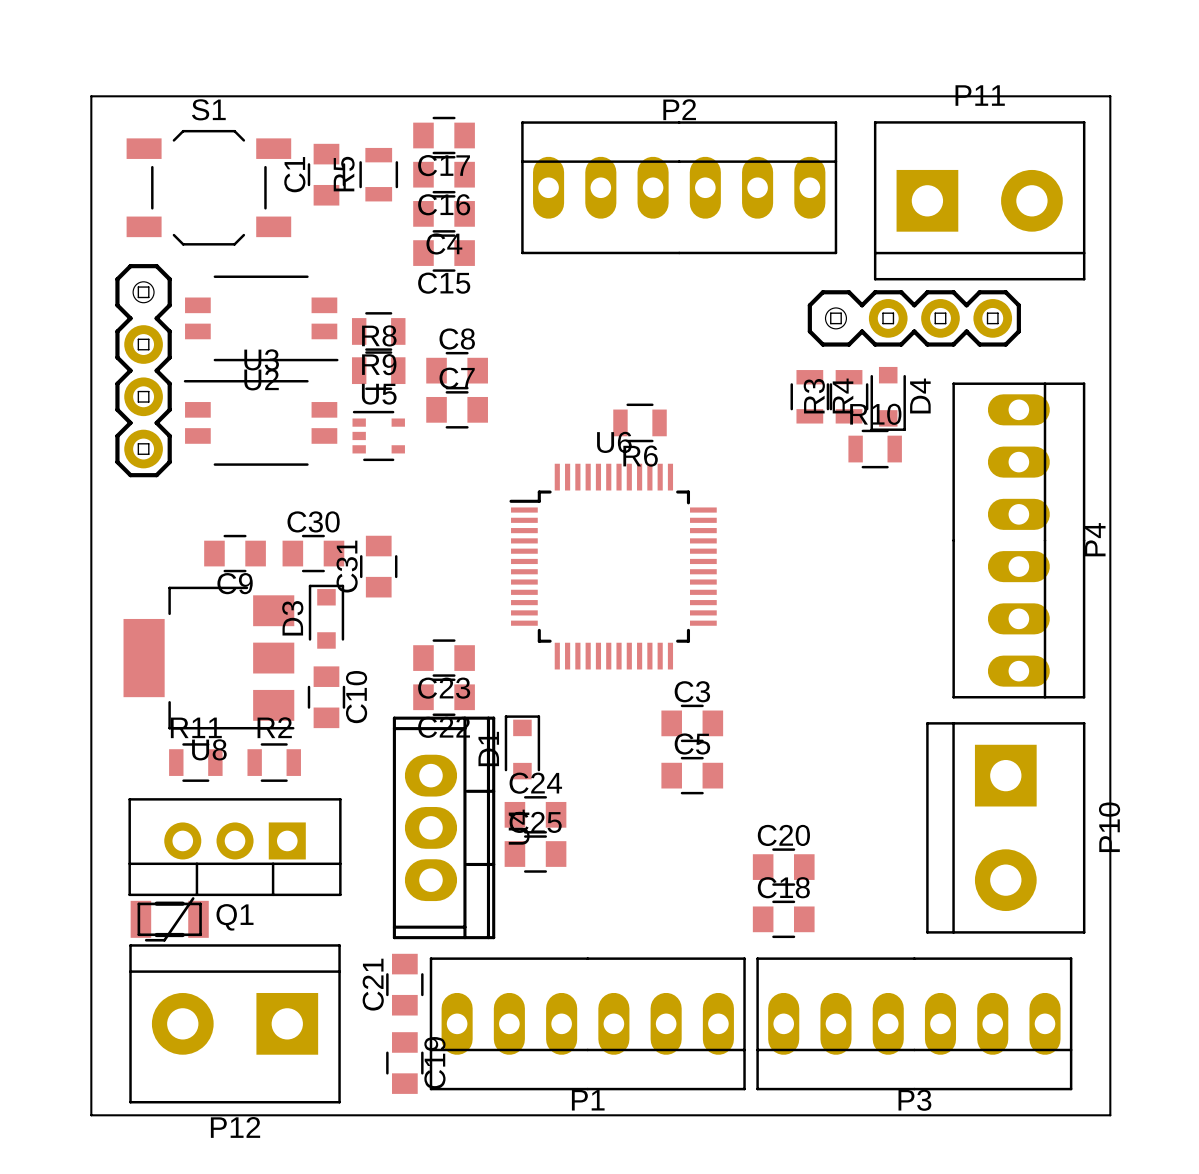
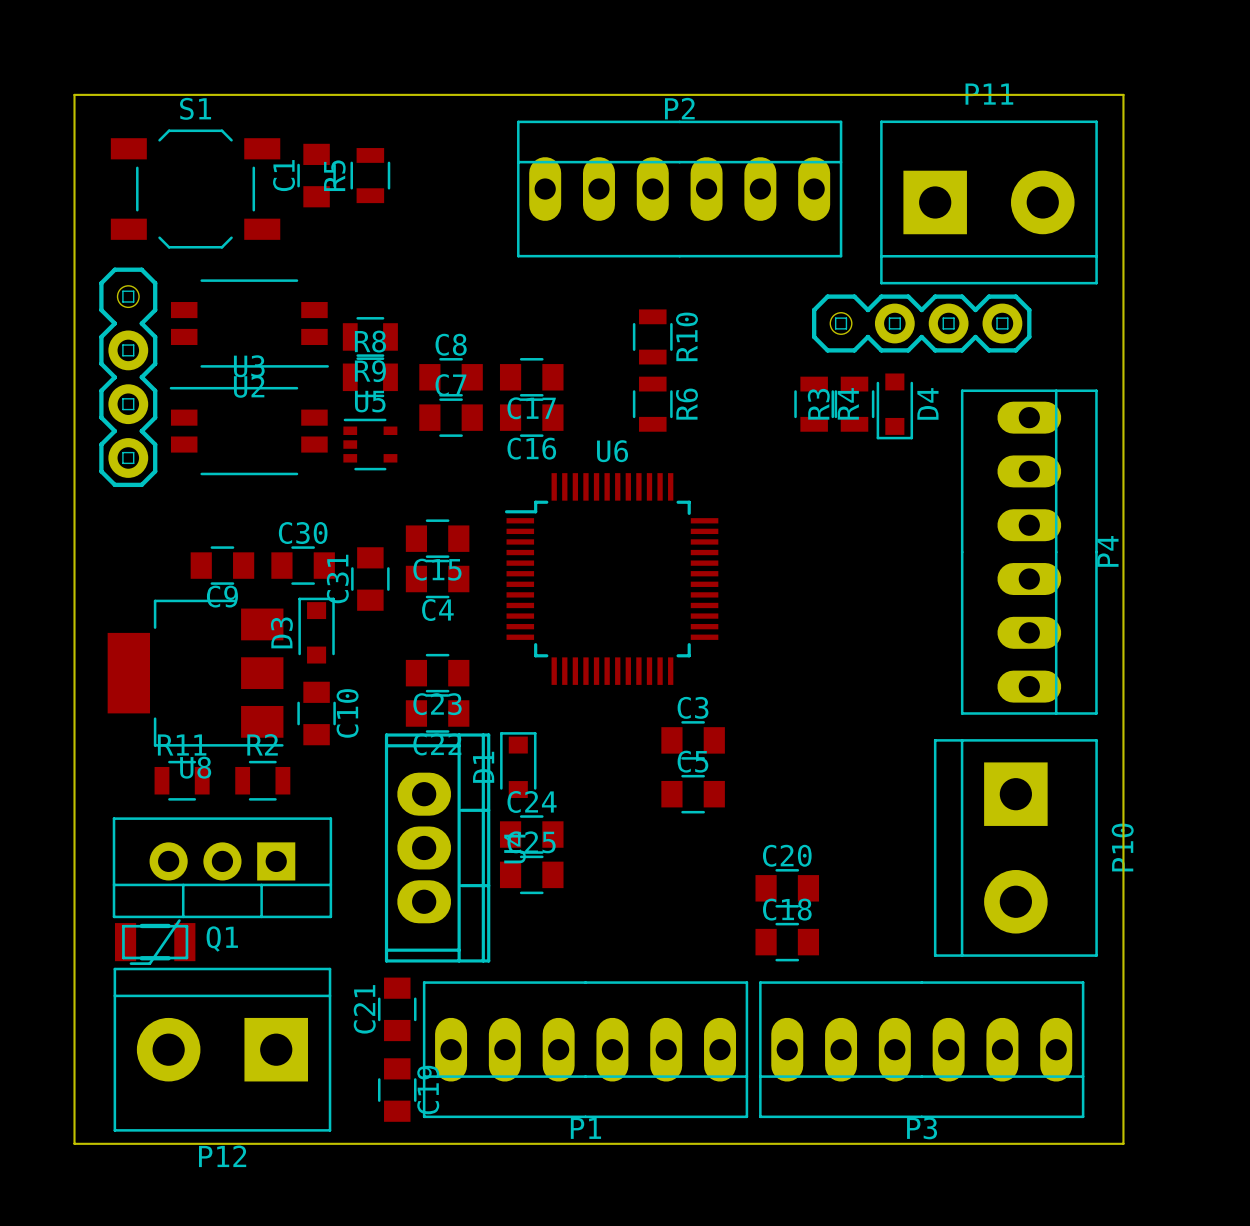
C17 position: (444, 135) -> (531, 377)
C16 position: (444, 174) -> (531, 417)
C4 position: (444, 213) -> (437, 579)
C15 position: (444, 253) -> (437, 538)
R6 rotation: 0° (640, 422) -> 90° clockwise (652, 404)
R10 rotation: 0° (875, 449) -> 90° clockwise (652, 336)
R10 position: (875, 449) -> (652, 336)
R6 name position: R6 (640, 456) -> R6 (686, 404)

